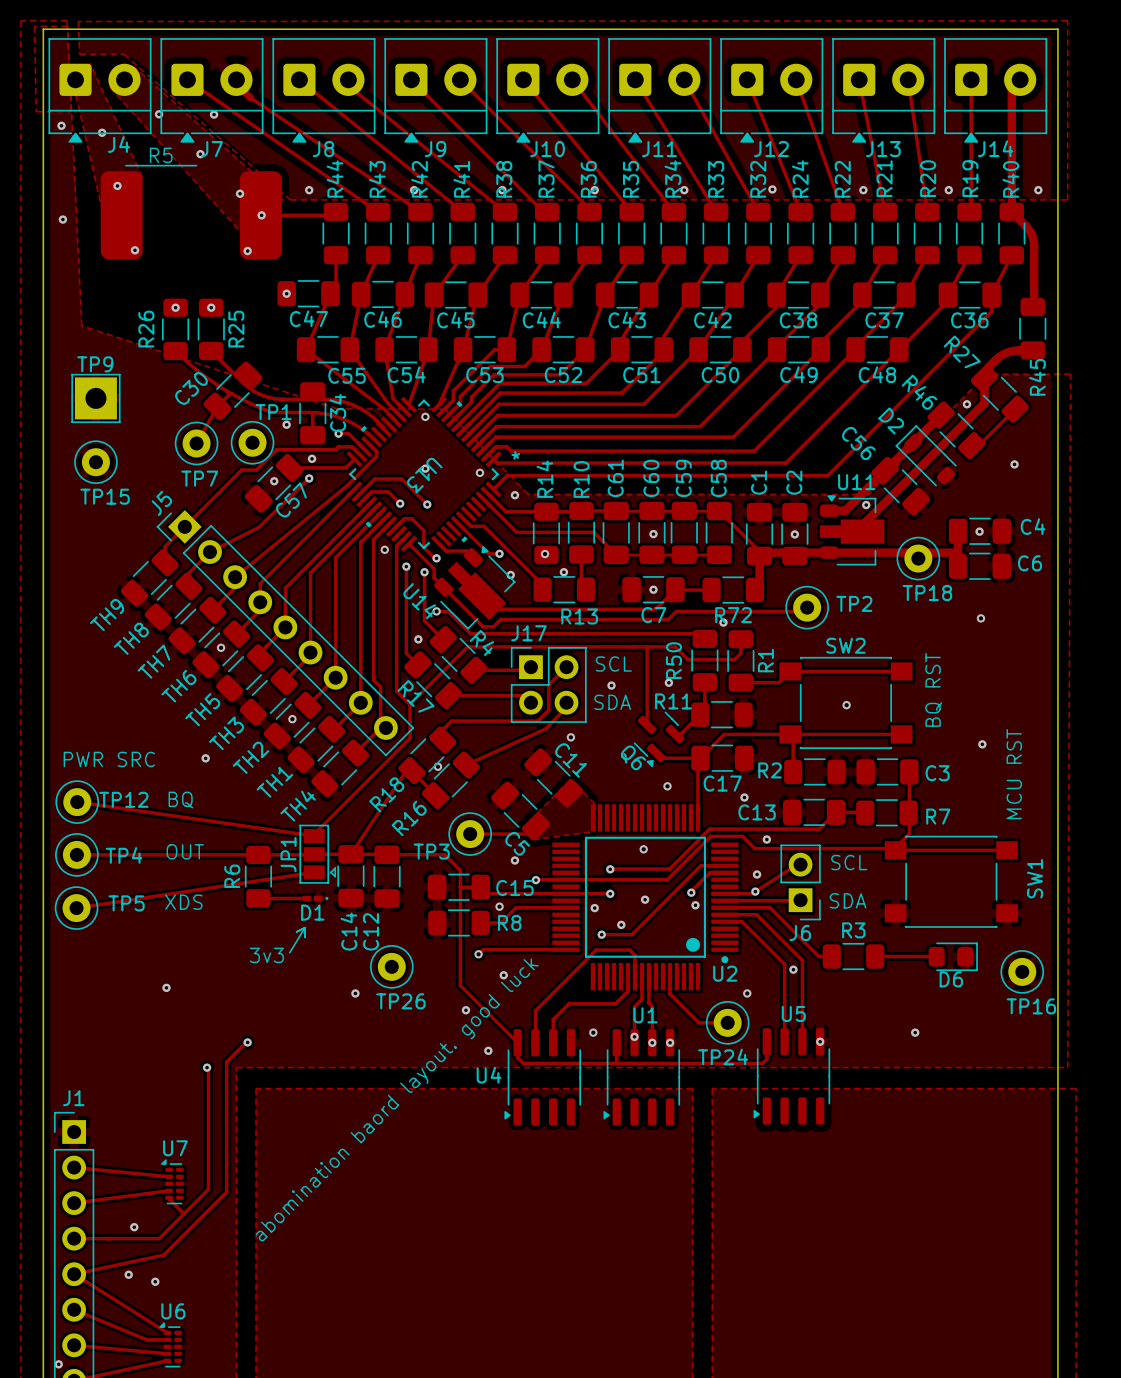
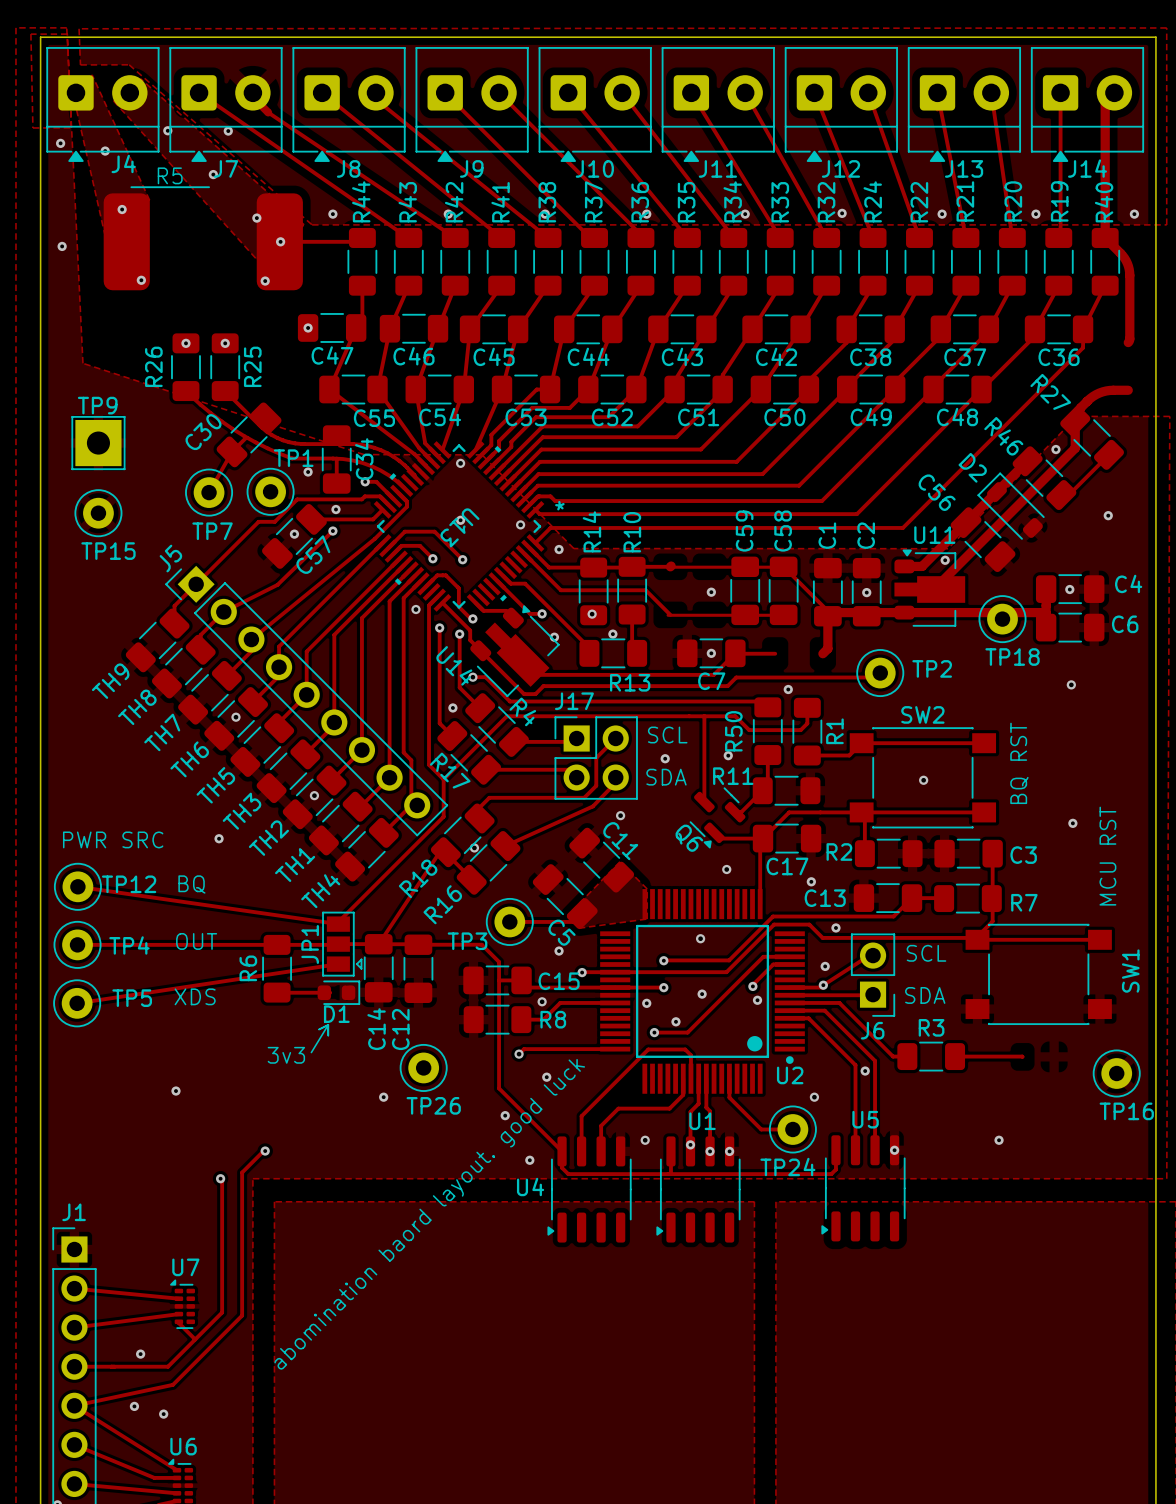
R45: (1032, 328) -> none
C61: (616, 532) -> none
C60: (651, 532) -> none
R72: (733, 590) -> none
D1 footprint: [302, 895, 329, 902] -> [317, 980, 361, 1005]
D6: (953, 956) -> none

